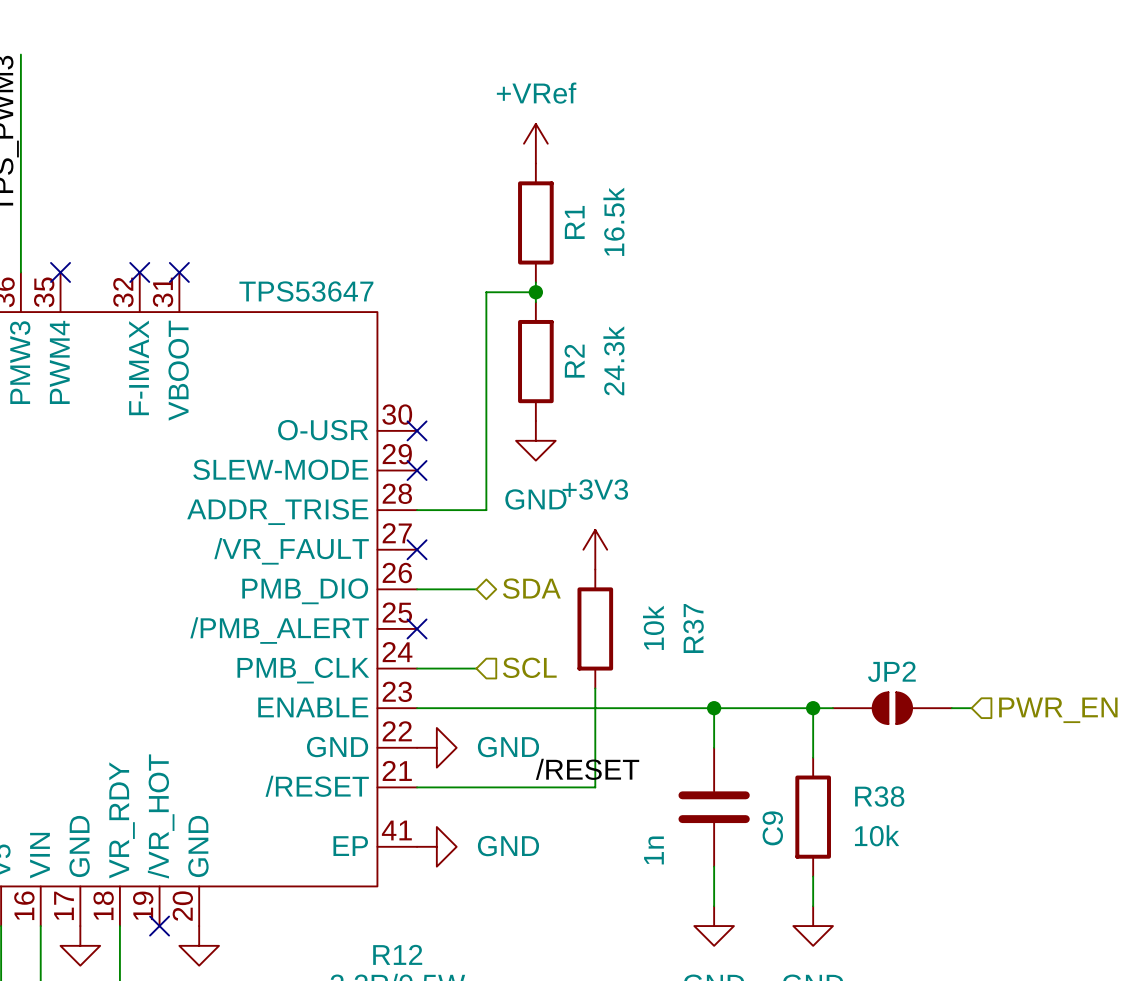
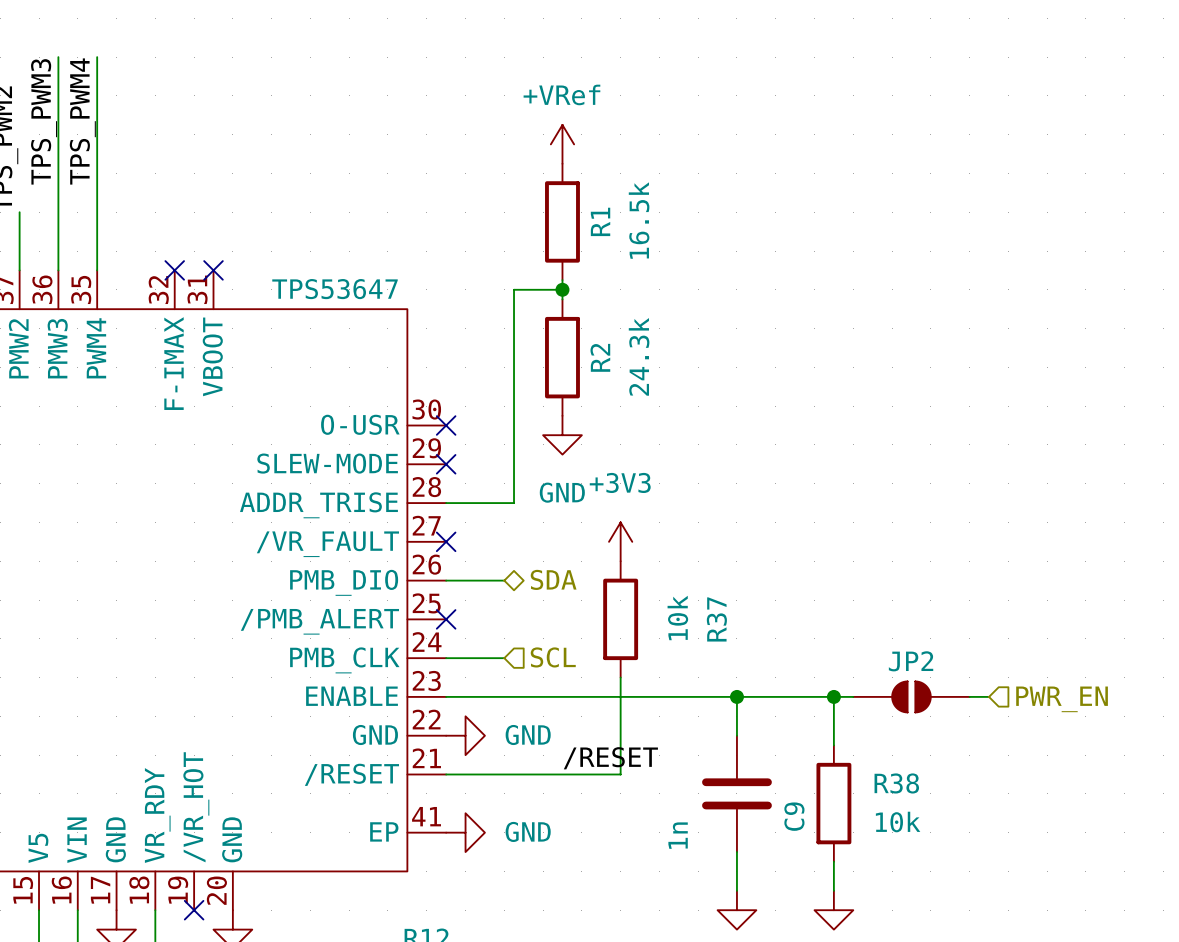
wire: none -> (97, 57) (97, 270)
label: none -> TPS_PWM4 (82, 121)
no-connect mark: (60, 272) -> none

